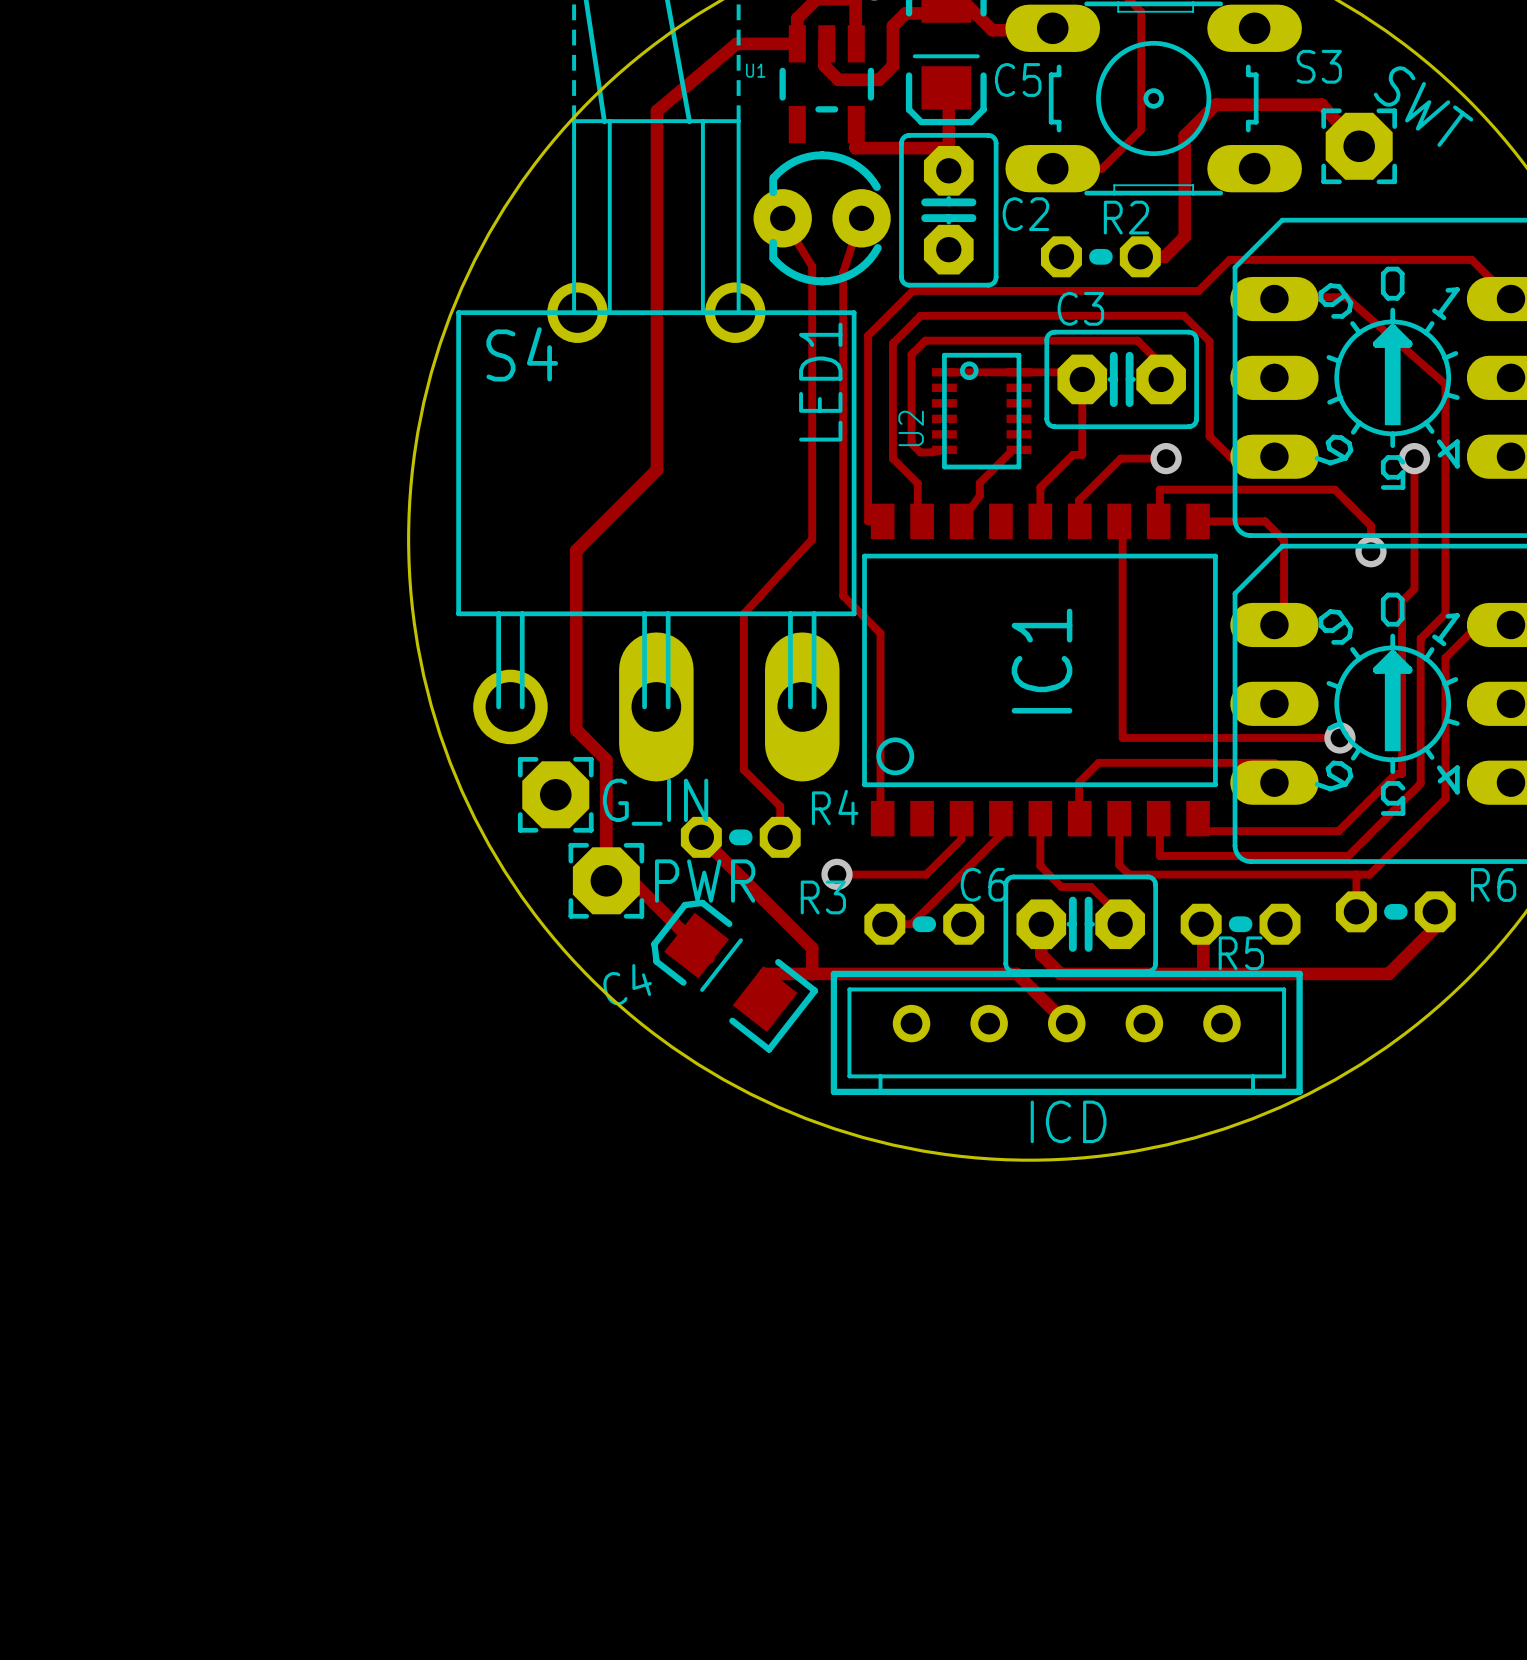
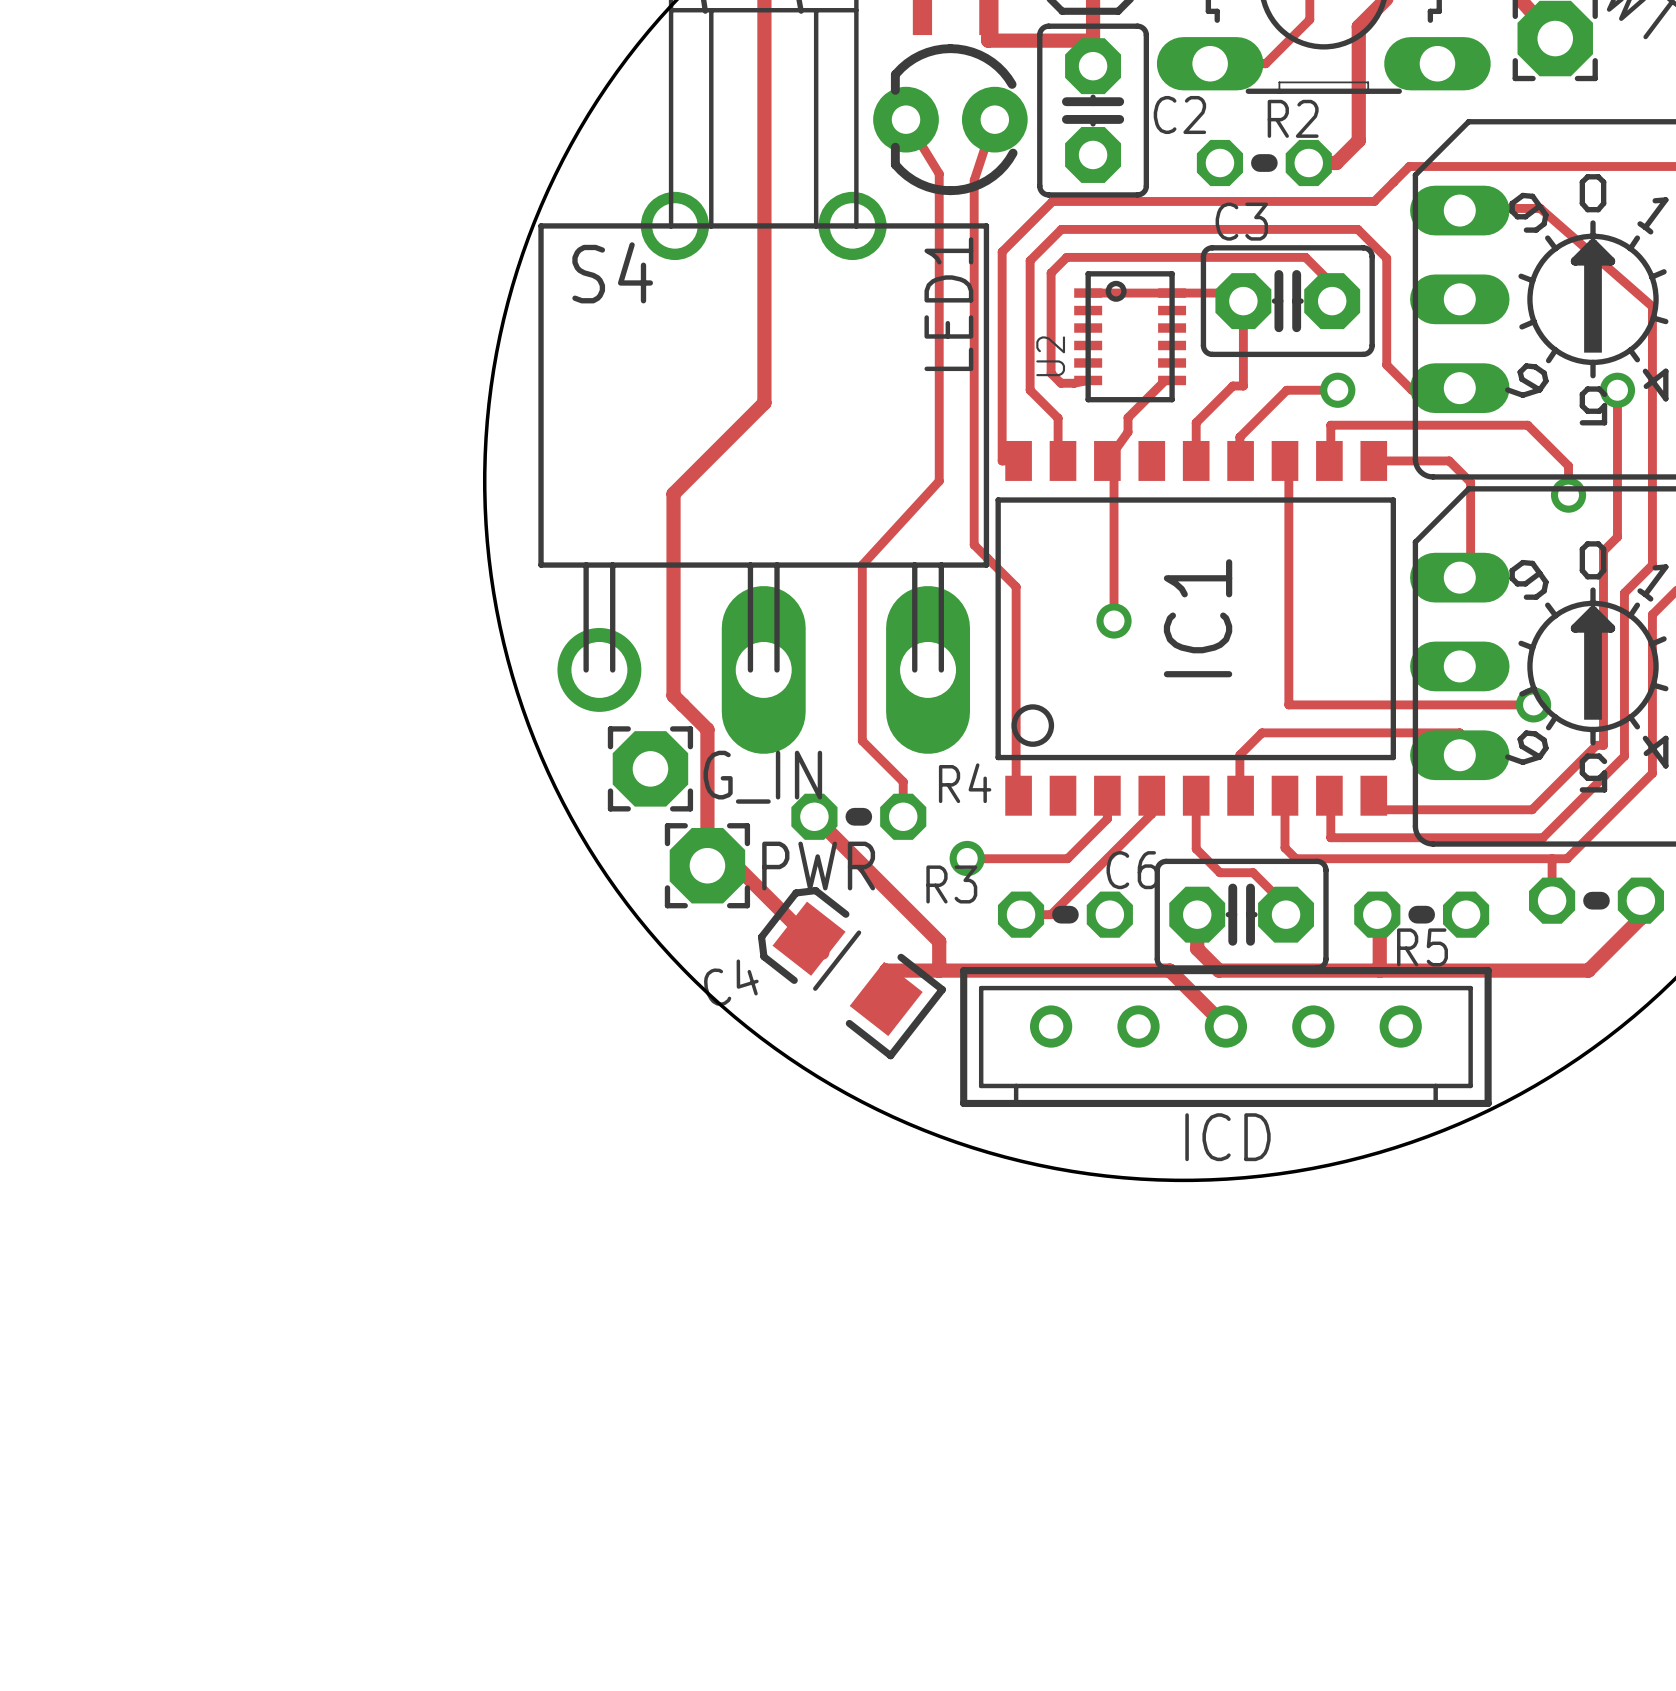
track: none -> (1100, 464) (1114, 464) (1114, 620)
via: none -> (1114, 620)

